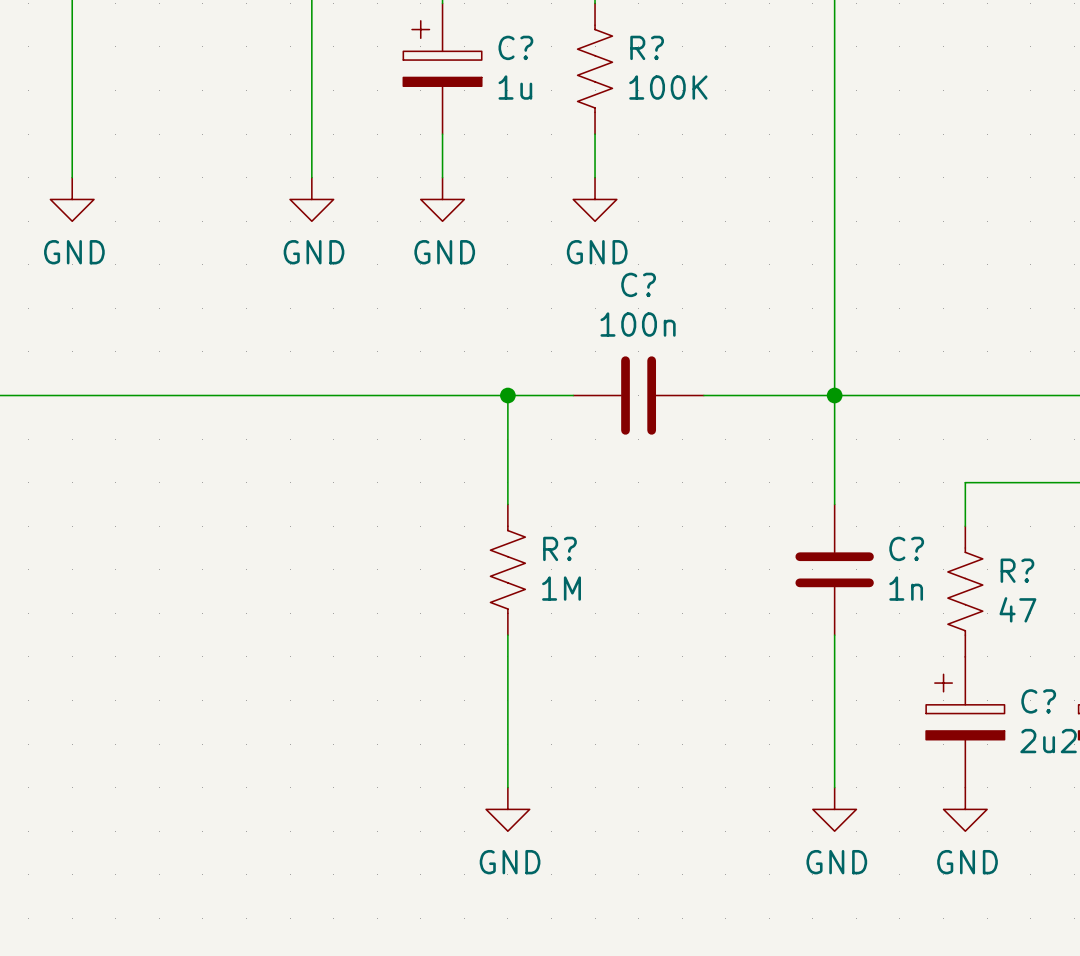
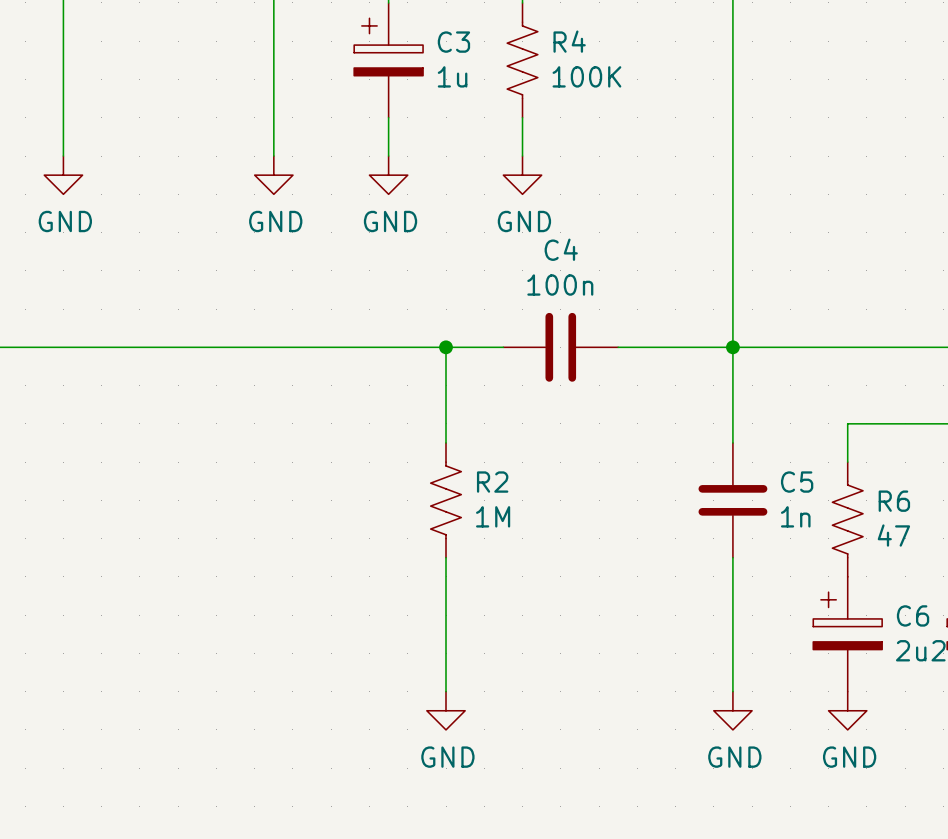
C? name: C? (515, 47) -> C3 (453, 42)
R? name: R? (647, 47) -> R4 (569, 41)
C? name: C? (638, 284) -> C4 (561, 249)
R? name: R? (559, 548) -> R2 (492, 482)
C? name: C? (906, 548) -> C5 (797, 482)
R? name: R? (1017, 570) -> R6 (894, 501)
C? name: C? (1038, 701) -> C6 (913, 615)

